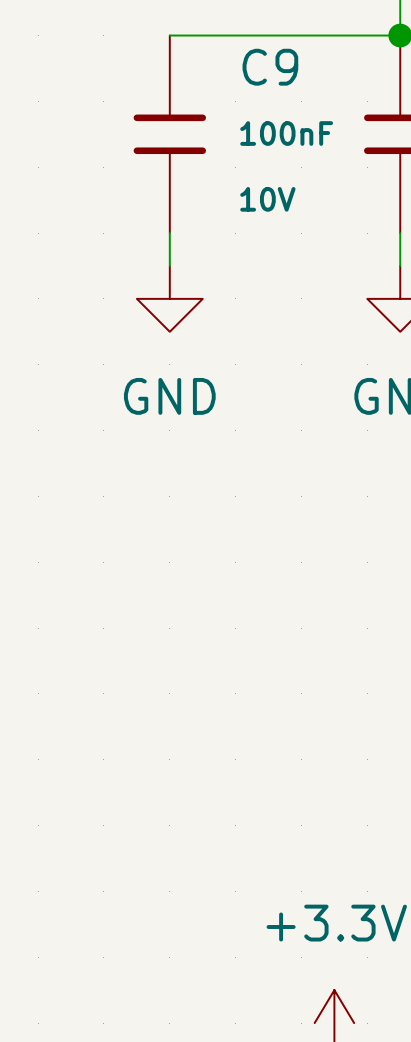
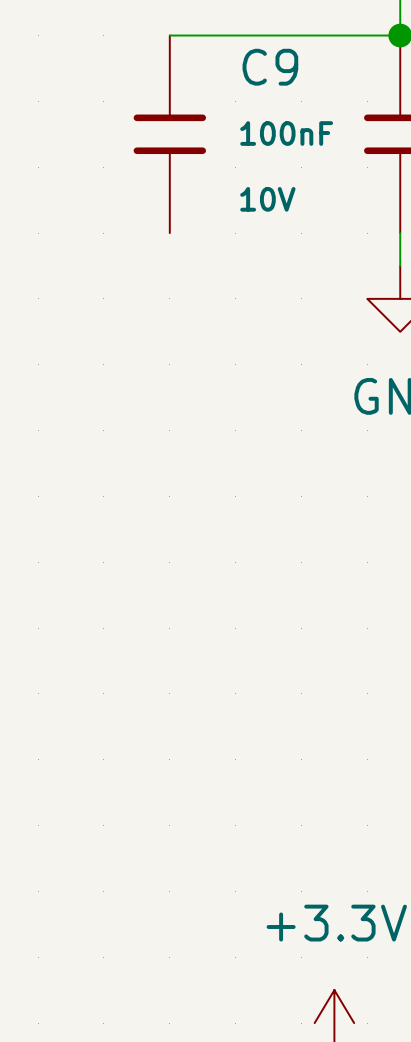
wire: (169, 233) (169, 265) -> none
power symbol: GND (169, 298) -> none

